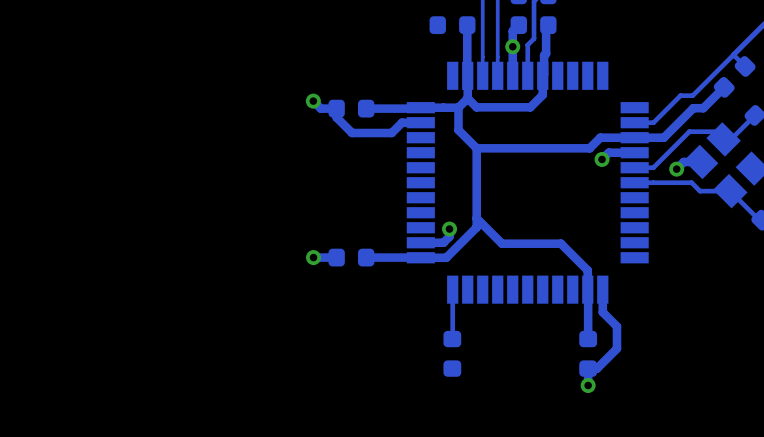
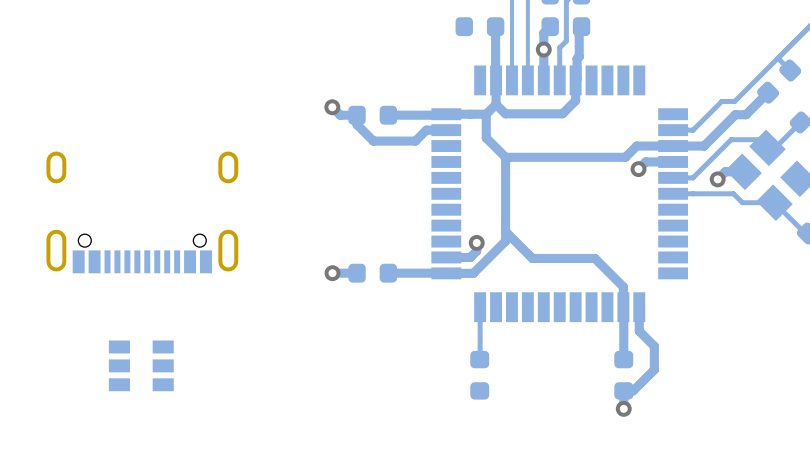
part: none -> (142, 212)
part: none -> (141, 365)

